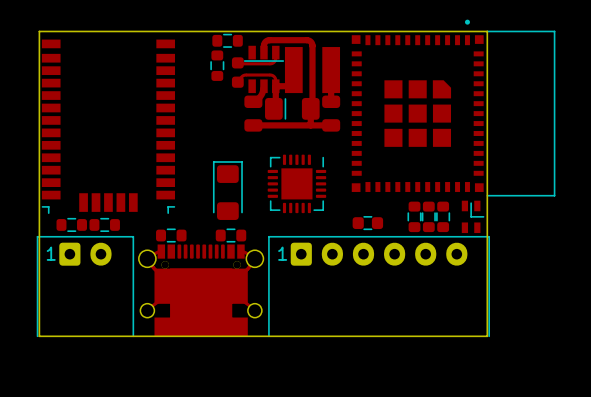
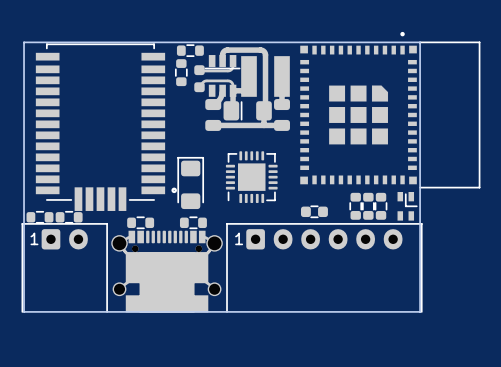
part: (108, 126) -> none
part: none -> (106, 127)
part rotation: 0° (296, 183) -> 180° (251, 177)
part: (71, 224) -> none
part: (104, 224) -> none
part: none -> (39, 217)
part: none -> (69, 217)

